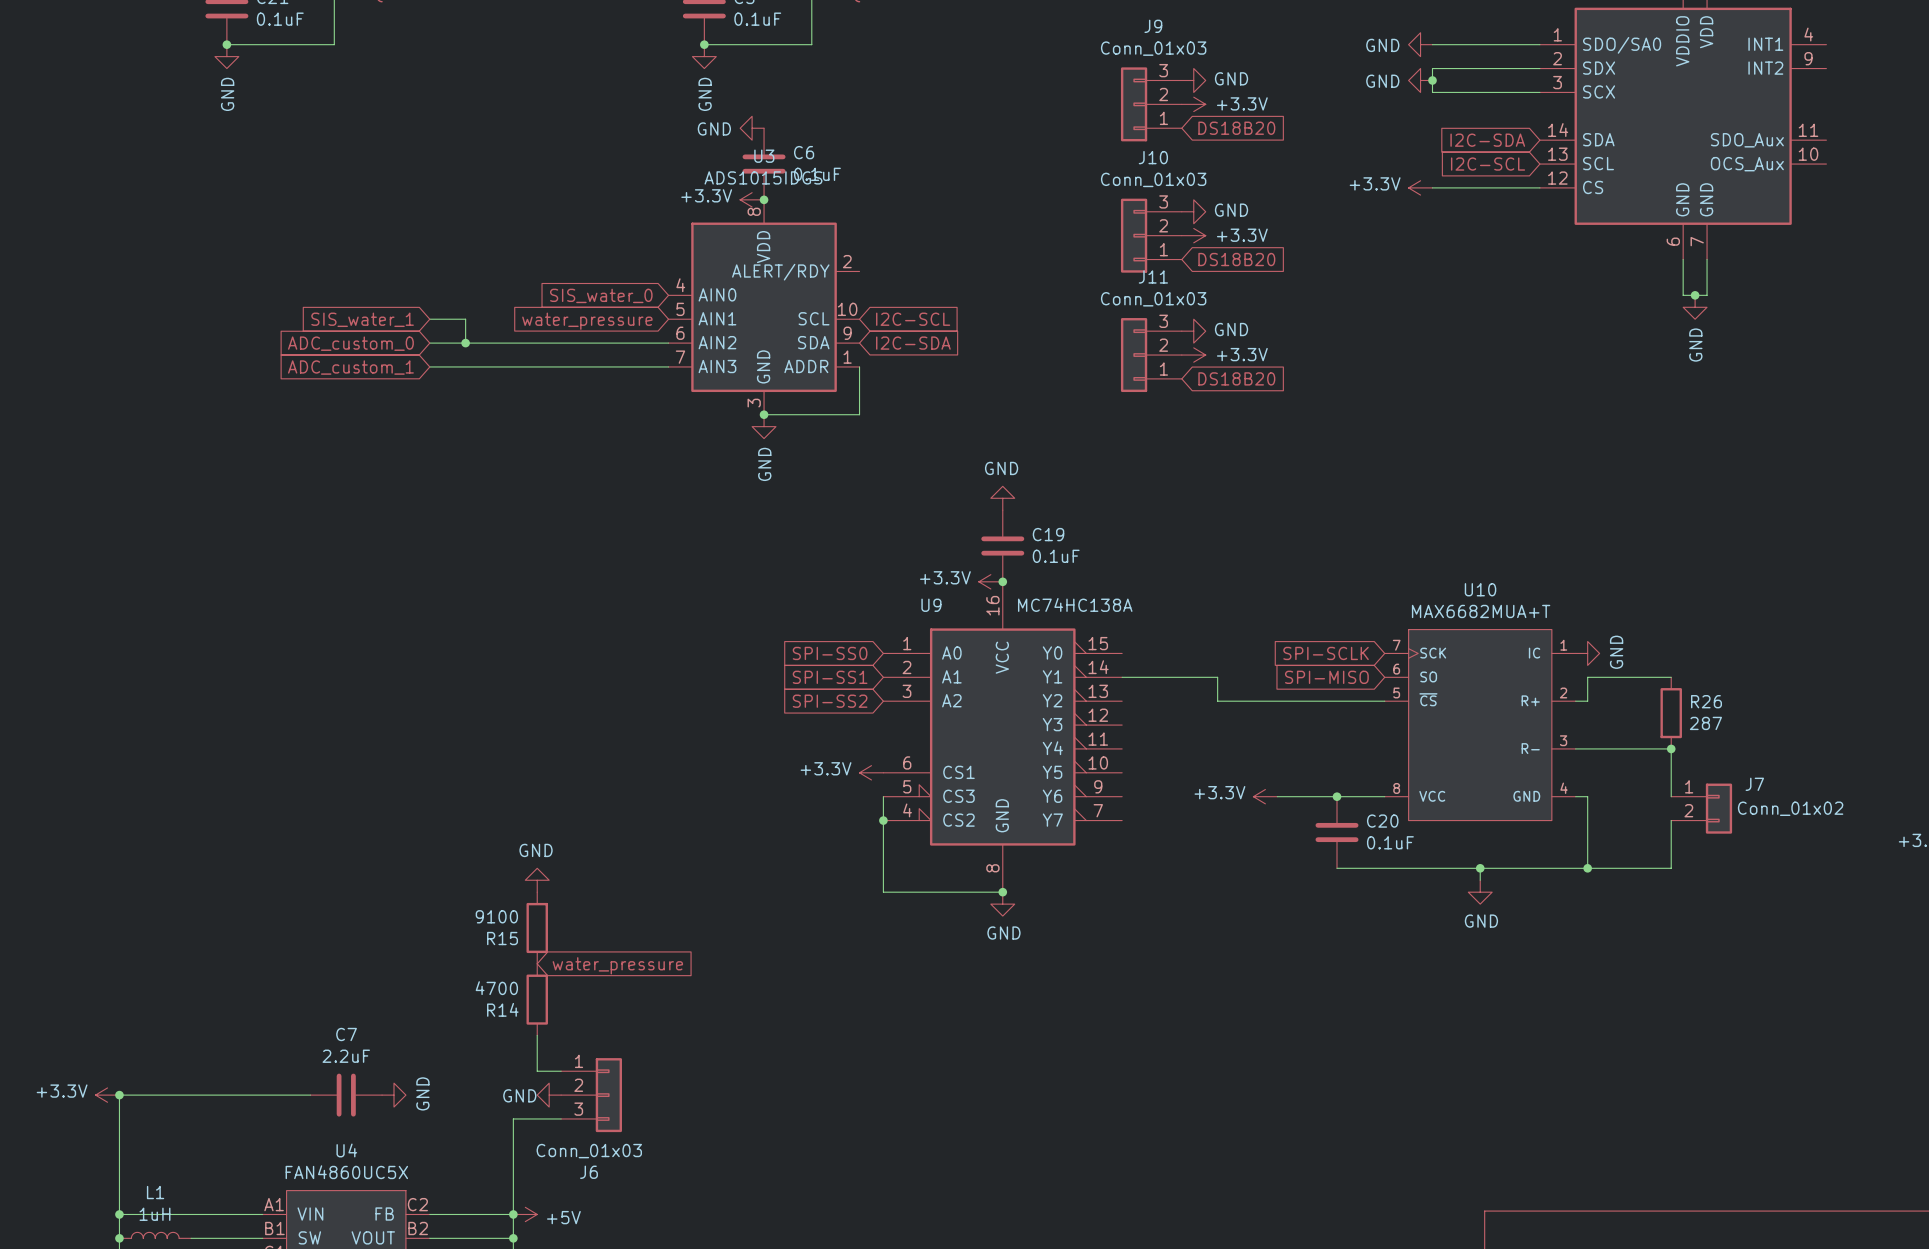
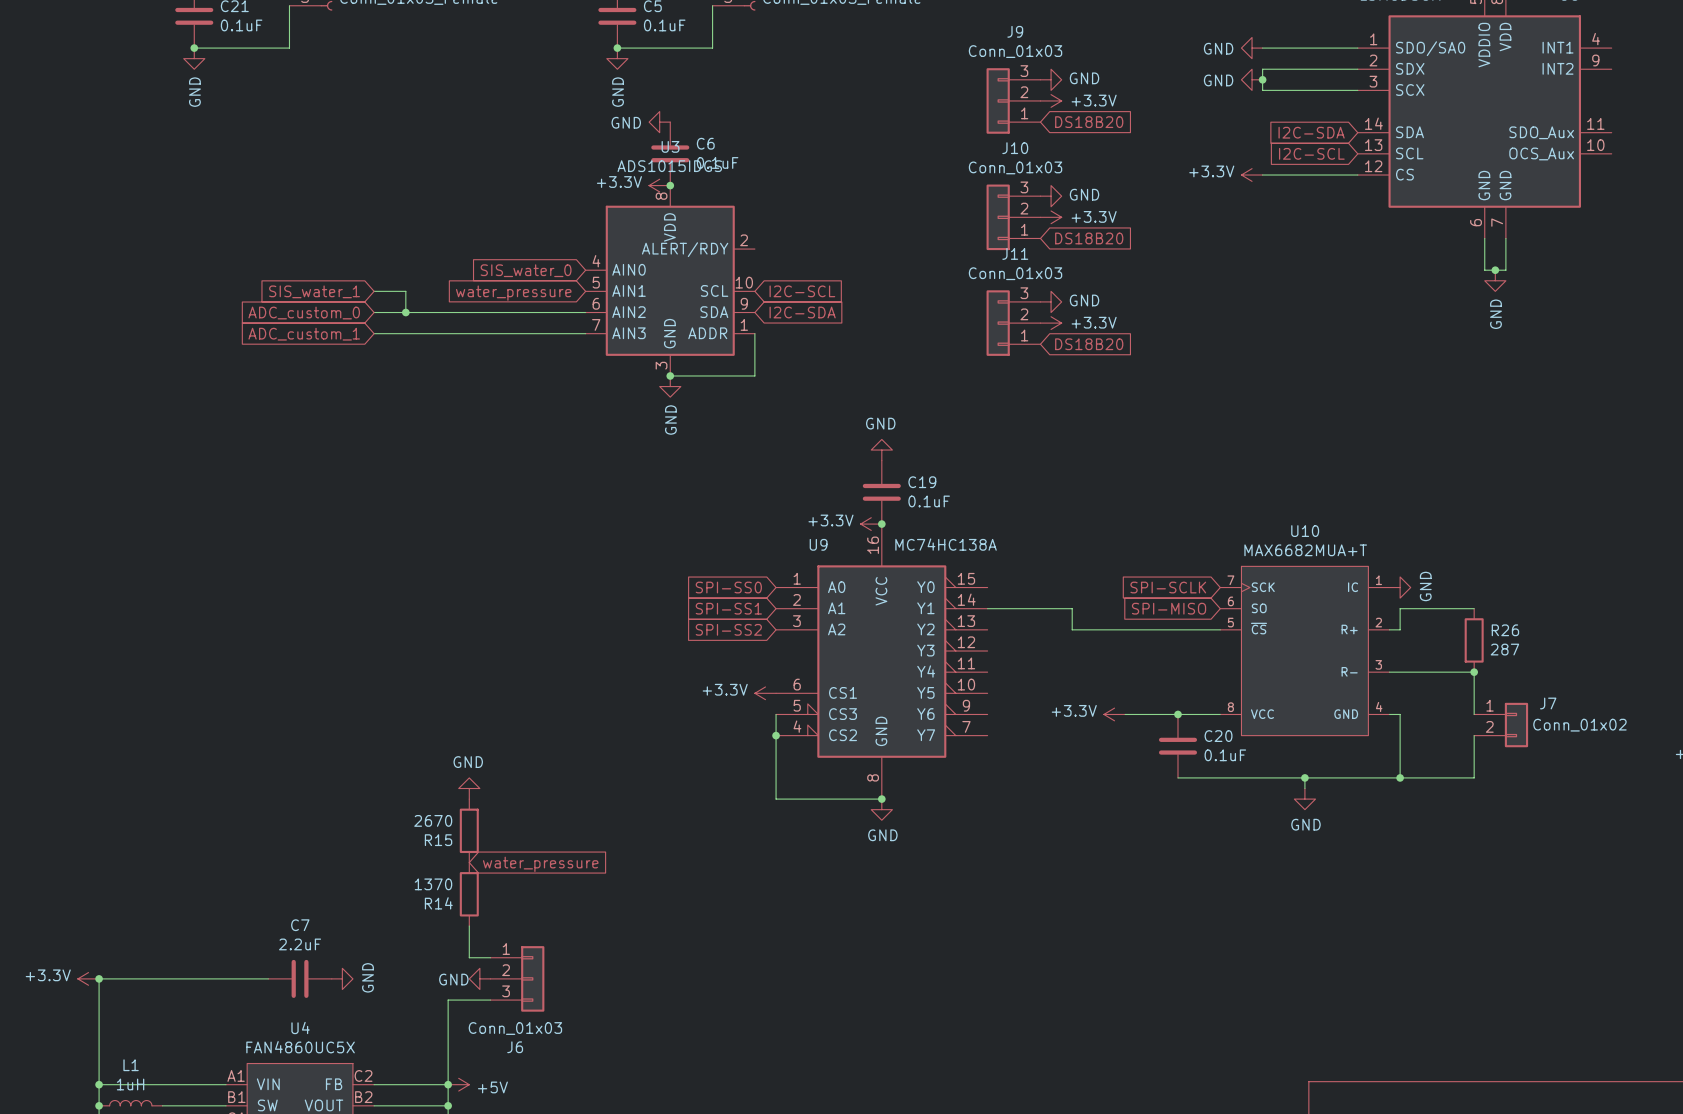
R15 value: 9100 (496, 916) -> 2670 (433, 820)
R14 value: 4700 (496, 988) -> 1370 (433, 884)

